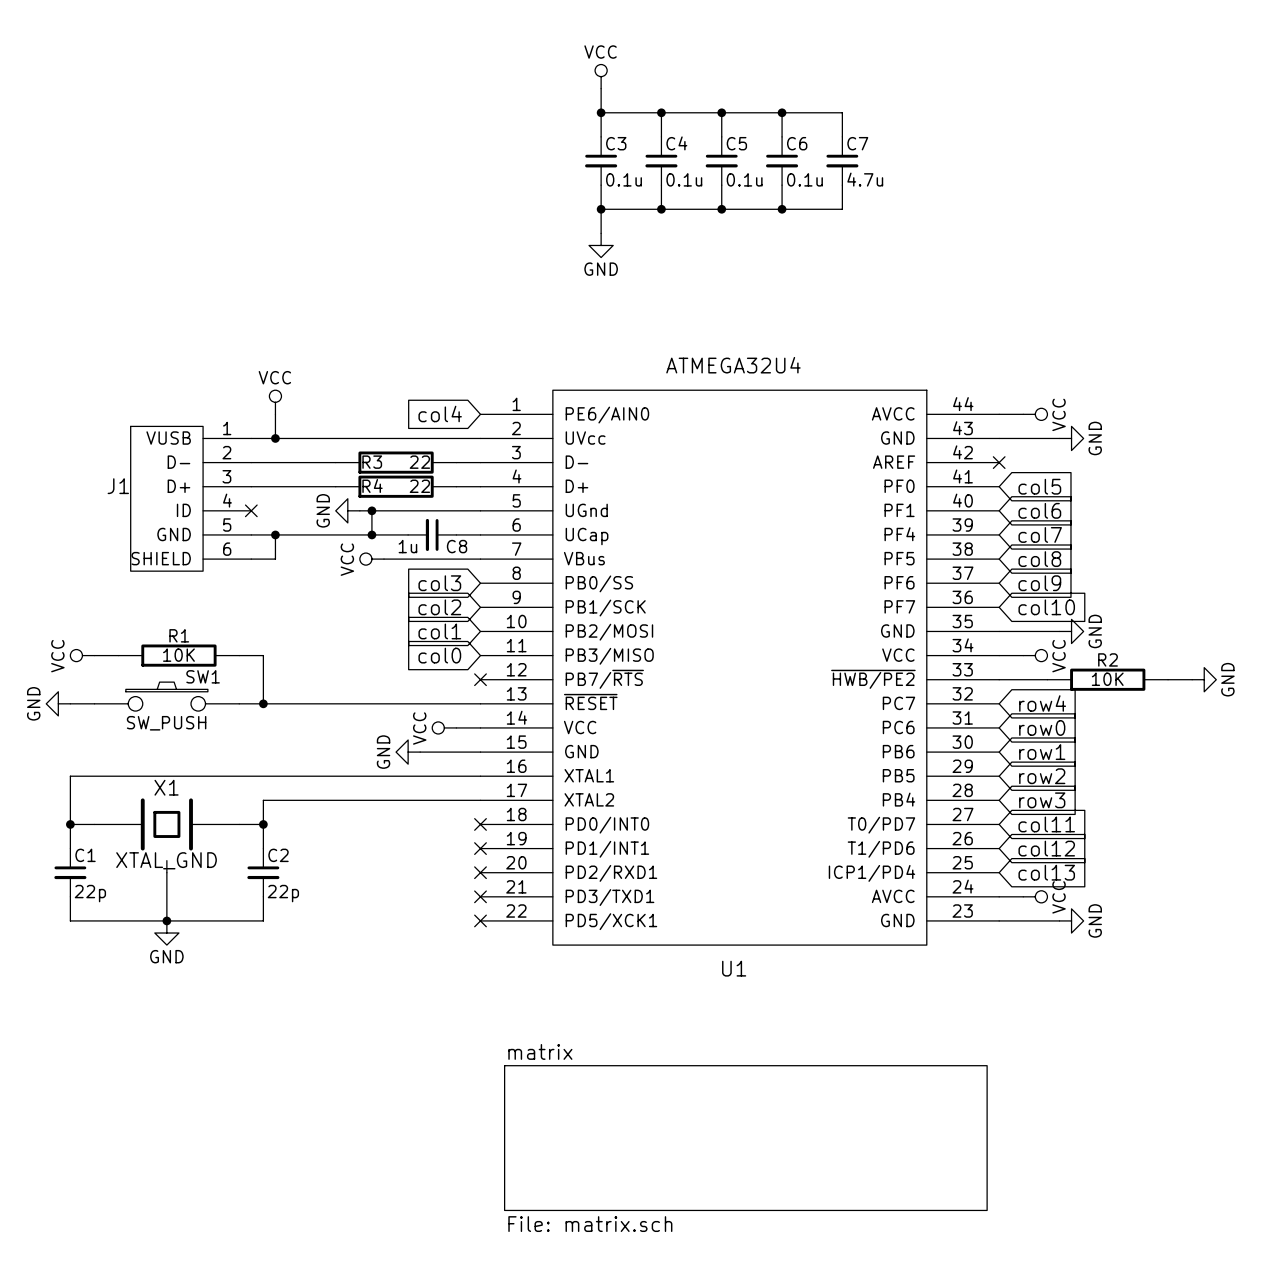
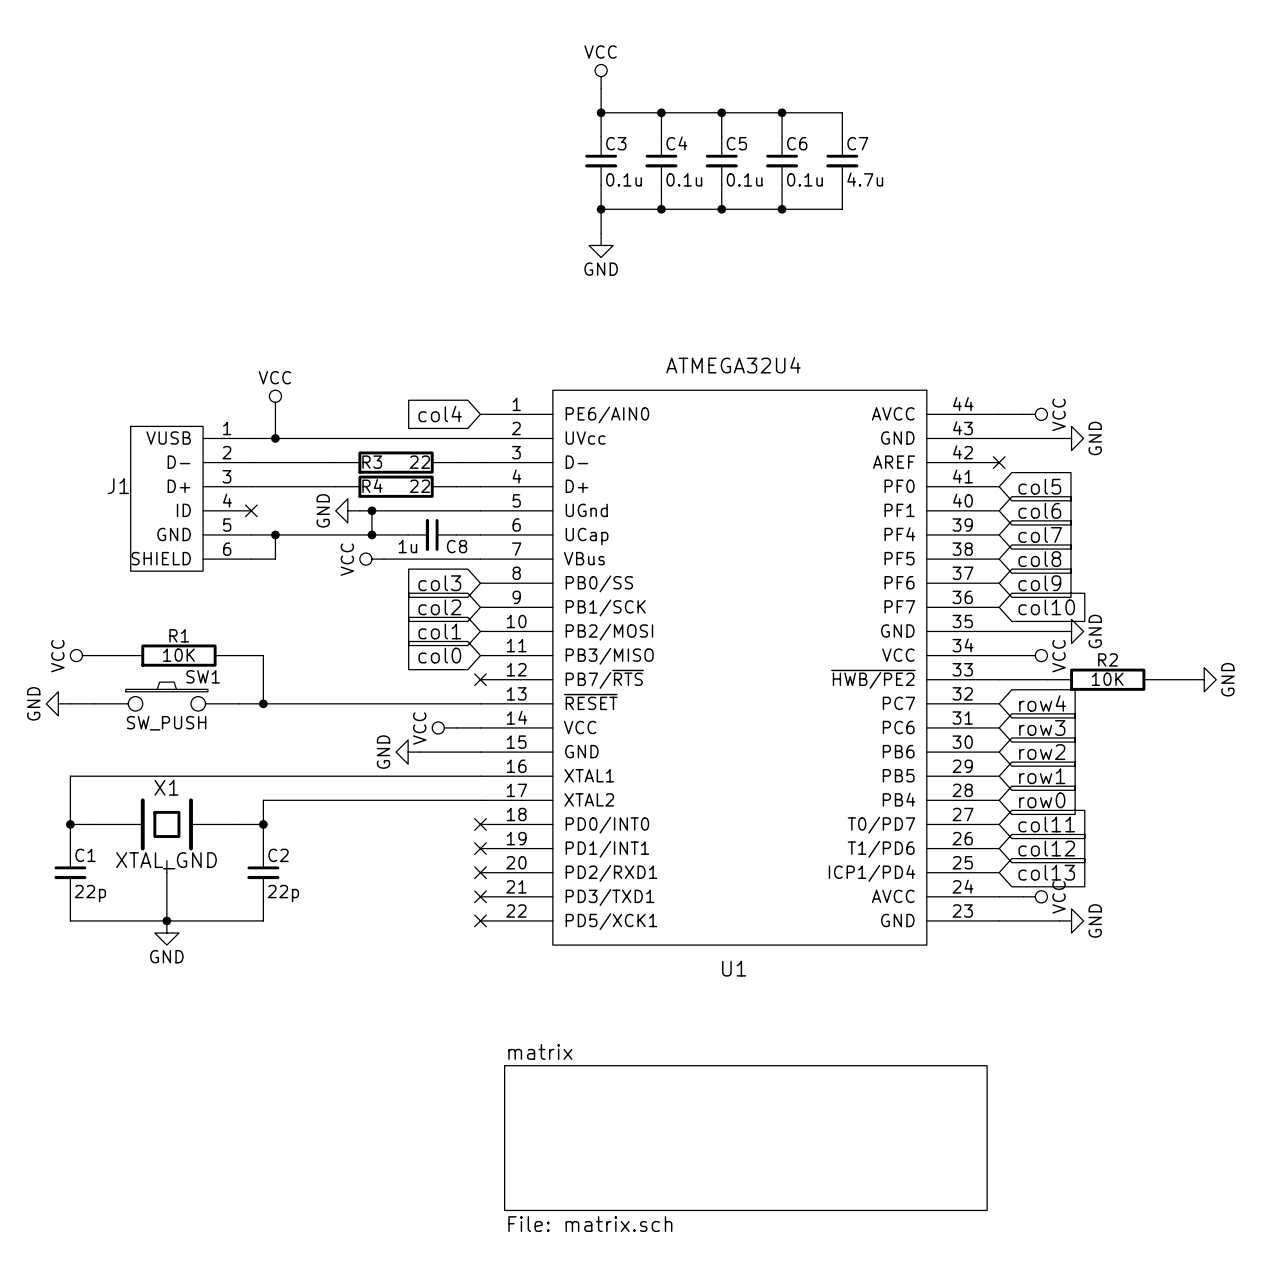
global label: row0 (1042, 727) -> row3 (1042, 727)
global label: row1 (1042, 752) -> row2 (1042, 752)
global label: row2 (1042, 776) -> row1 (1042, 776)
global label: row3 (1042, 800) -> row0 (1042, 800)

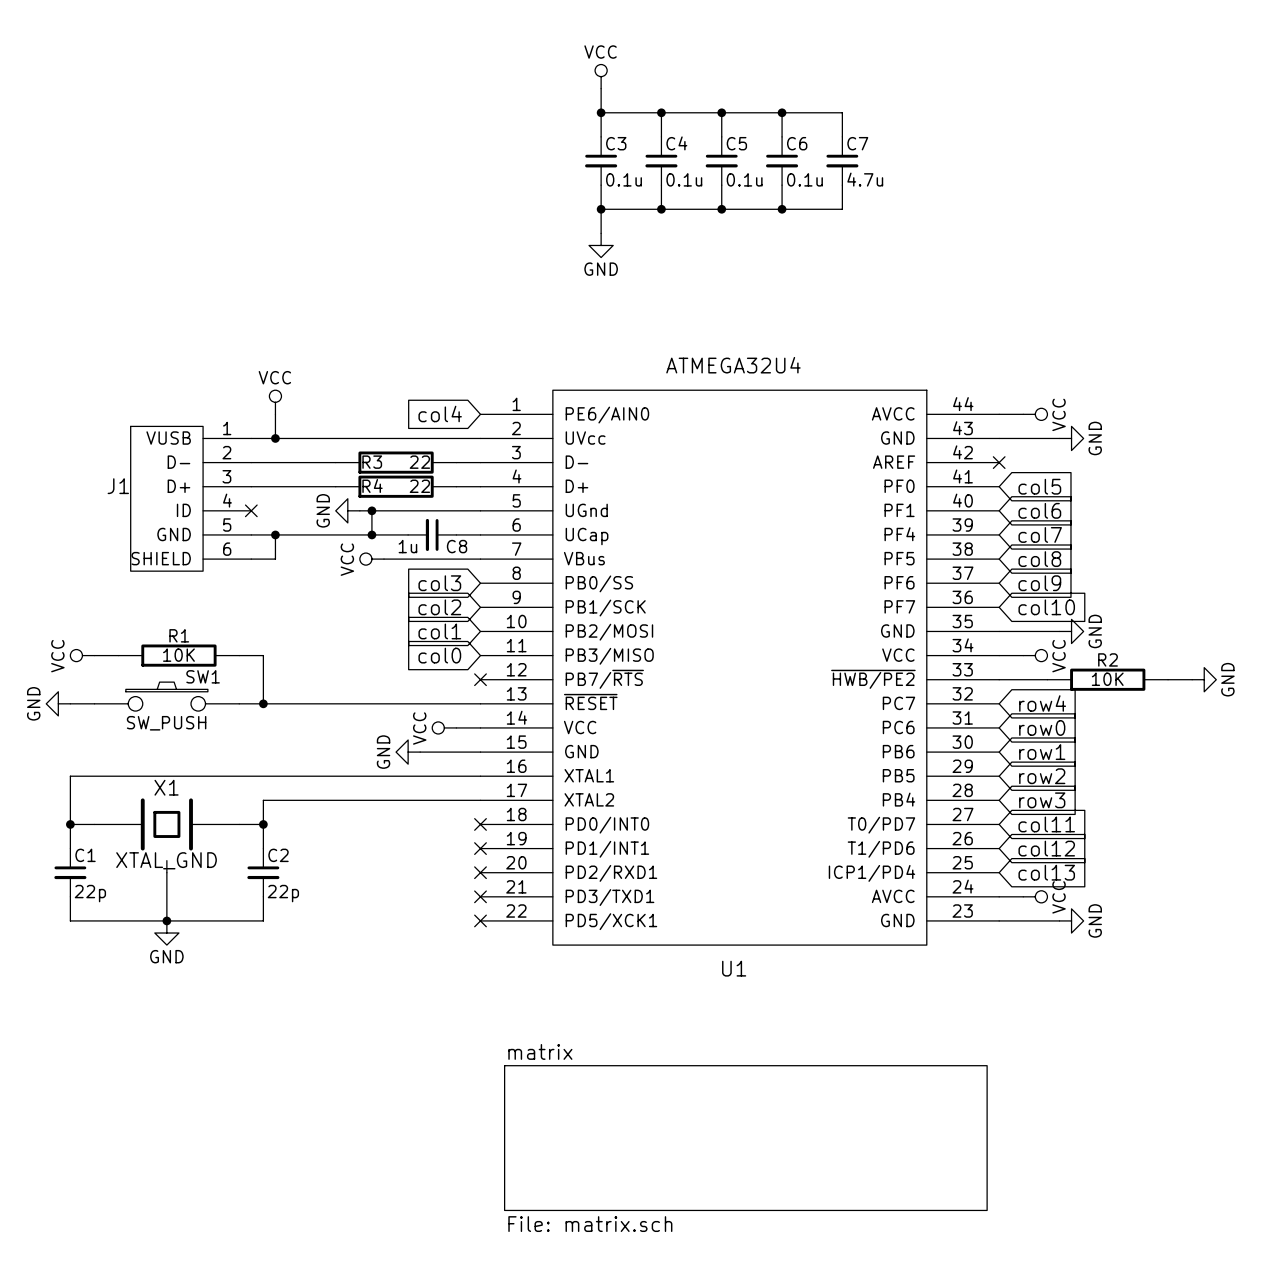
global label: row3 (1042, 727) -> row0 (1042, 727)
global label: row2 (1042, 752) -> row1 (1042, 752)
global label: row1 (1042, 776) -> row2 (1042, 776)
global label: row0 (1042, 800) -> row3 (1042, 800)

